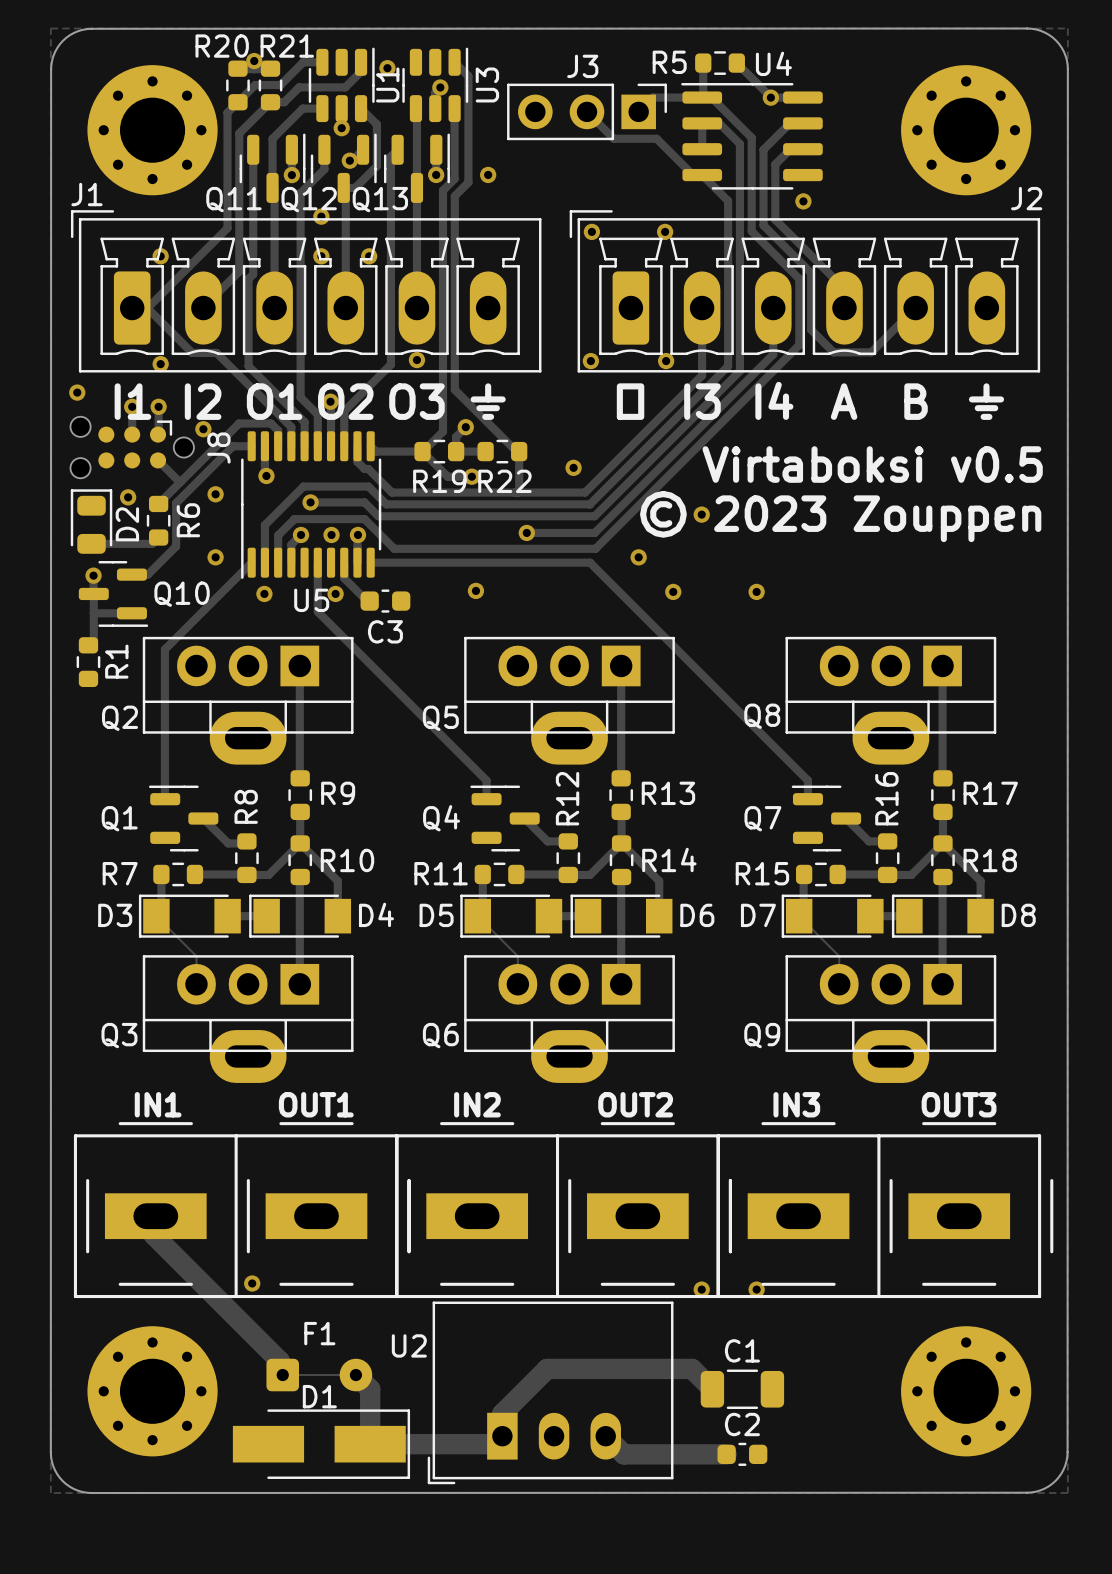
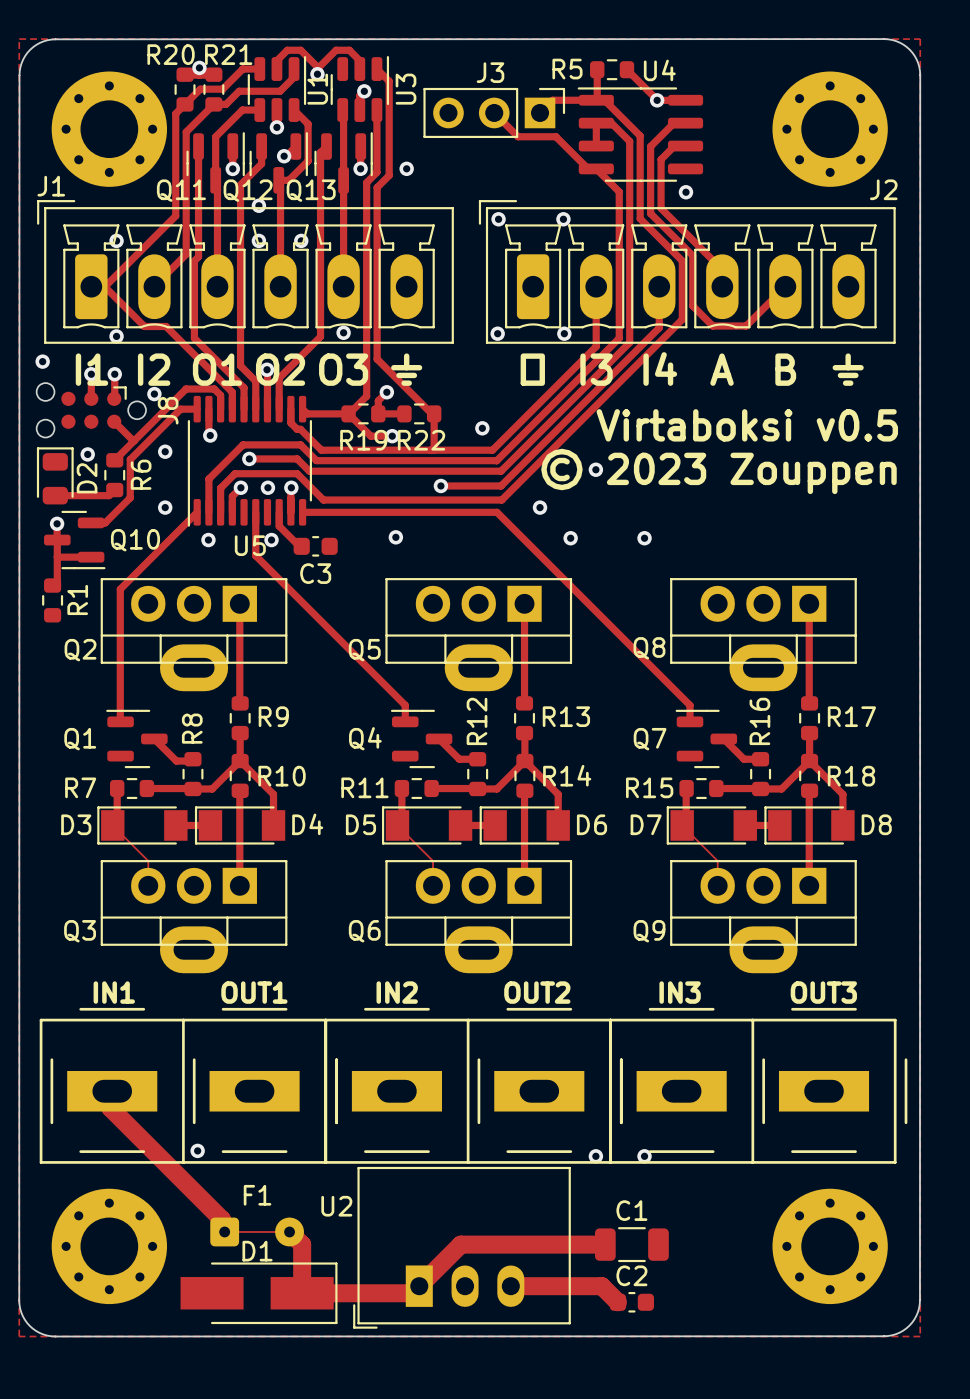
track: none -> (276, 69) (276, 60) (287, 50) (300, 50) (317, 67) (317, 74)
track: none -> (317, 68) (336, 50) (349, 50) (359, 60) (359, 69)
track: (712, 1389) (692, 1368) (547, 1368) (502, 1413) (502, 1436) -> (605, 1244) (460, 1244) (419, 1286)
track: (605, 1436) (623, 1454) (726, 1454) -> (510, 1286) (601, 1286) (617, 1302)

